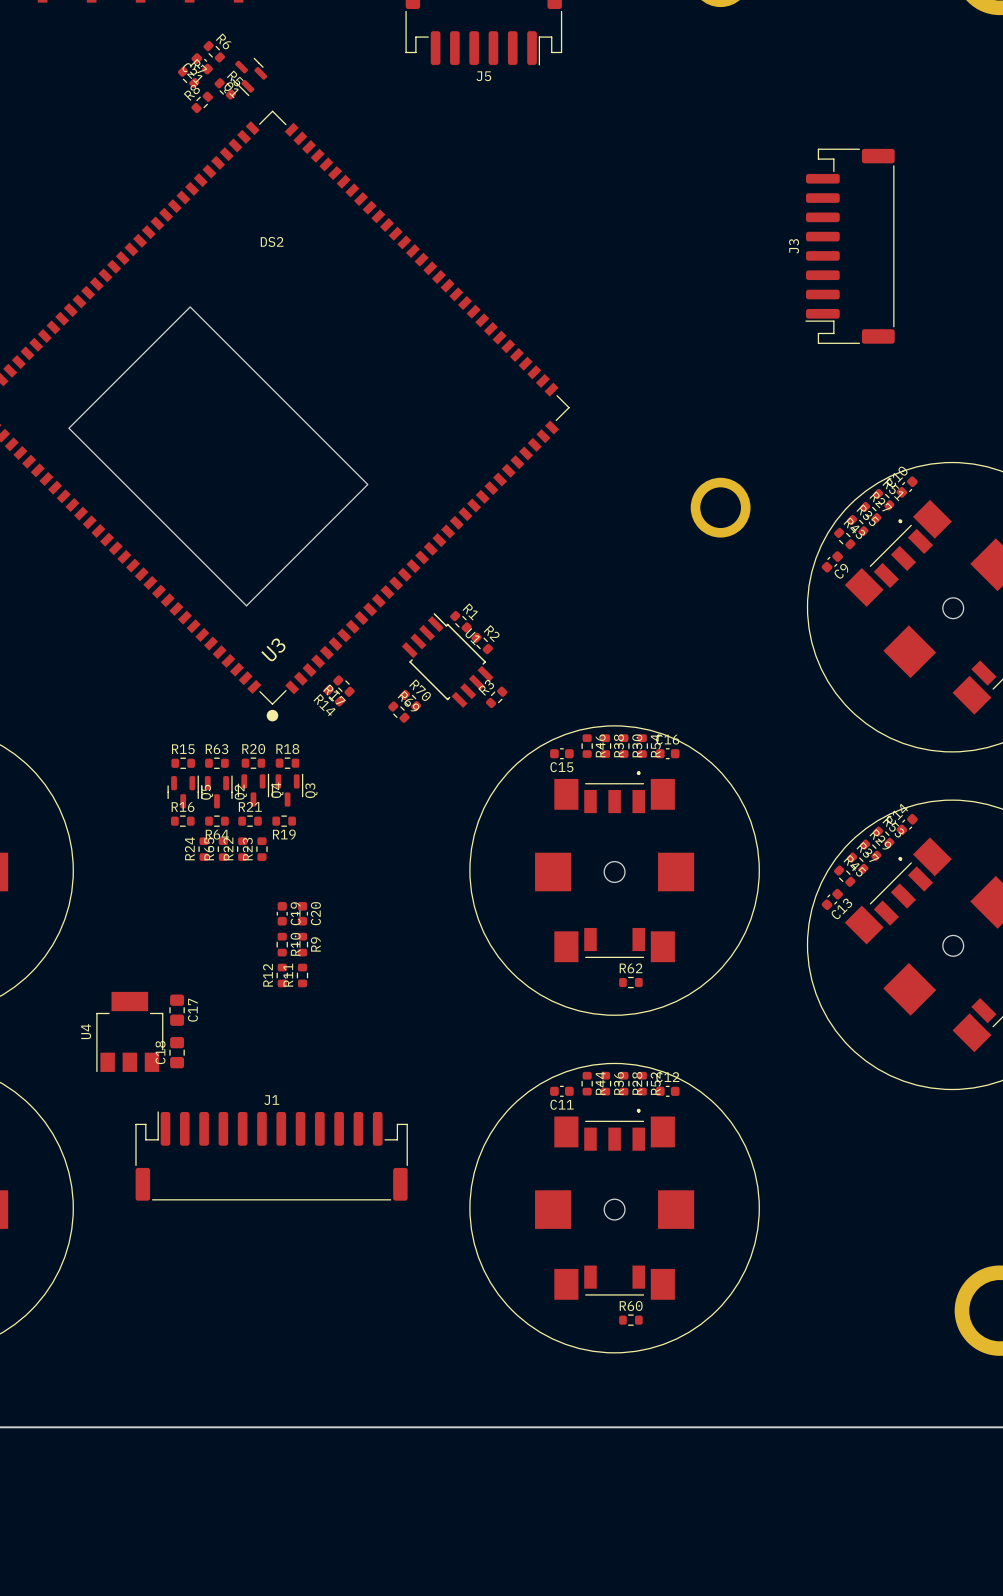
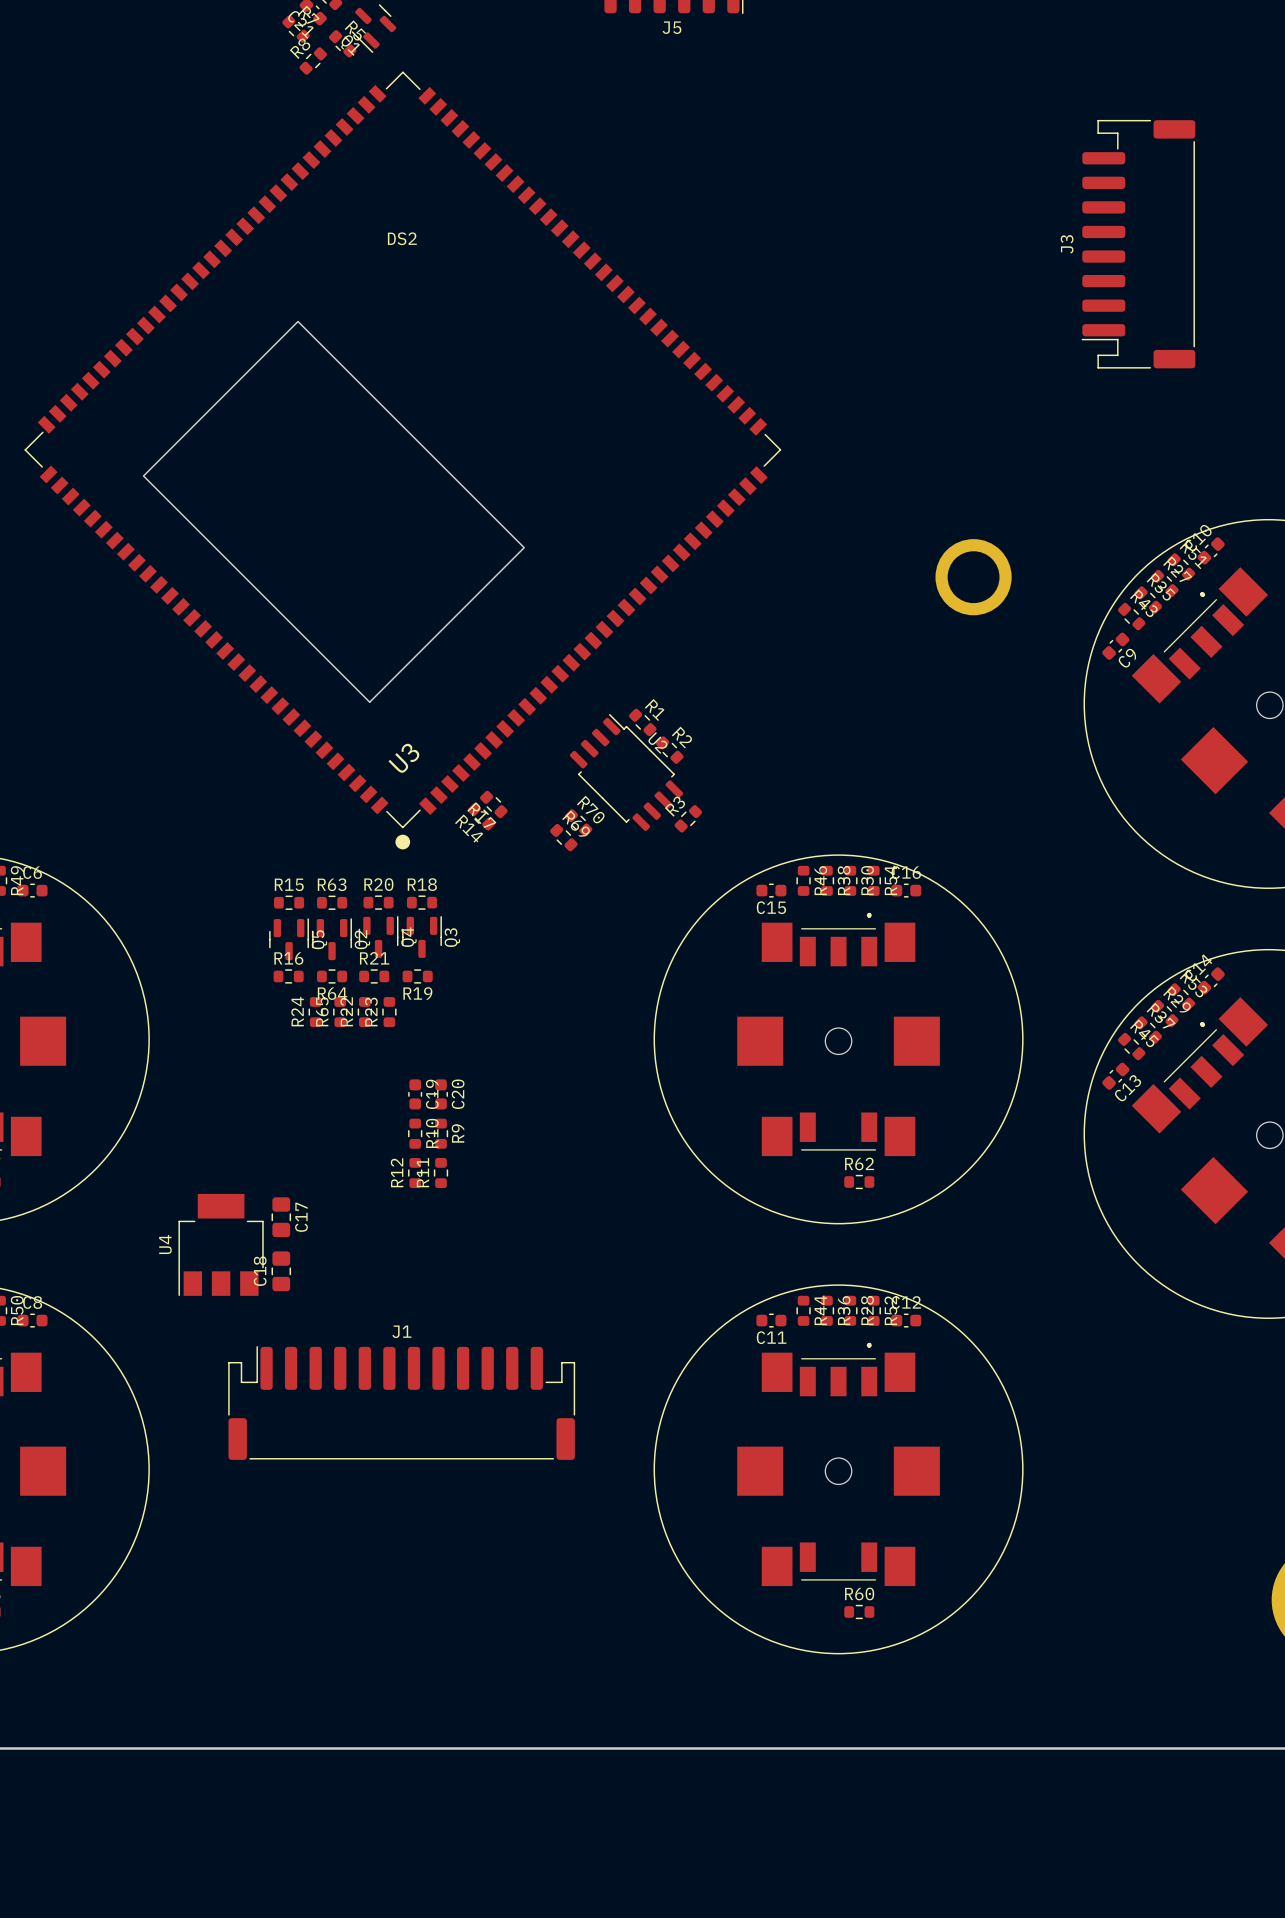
U1: (447, 660) -> none
U2: none -> (626, 772)

